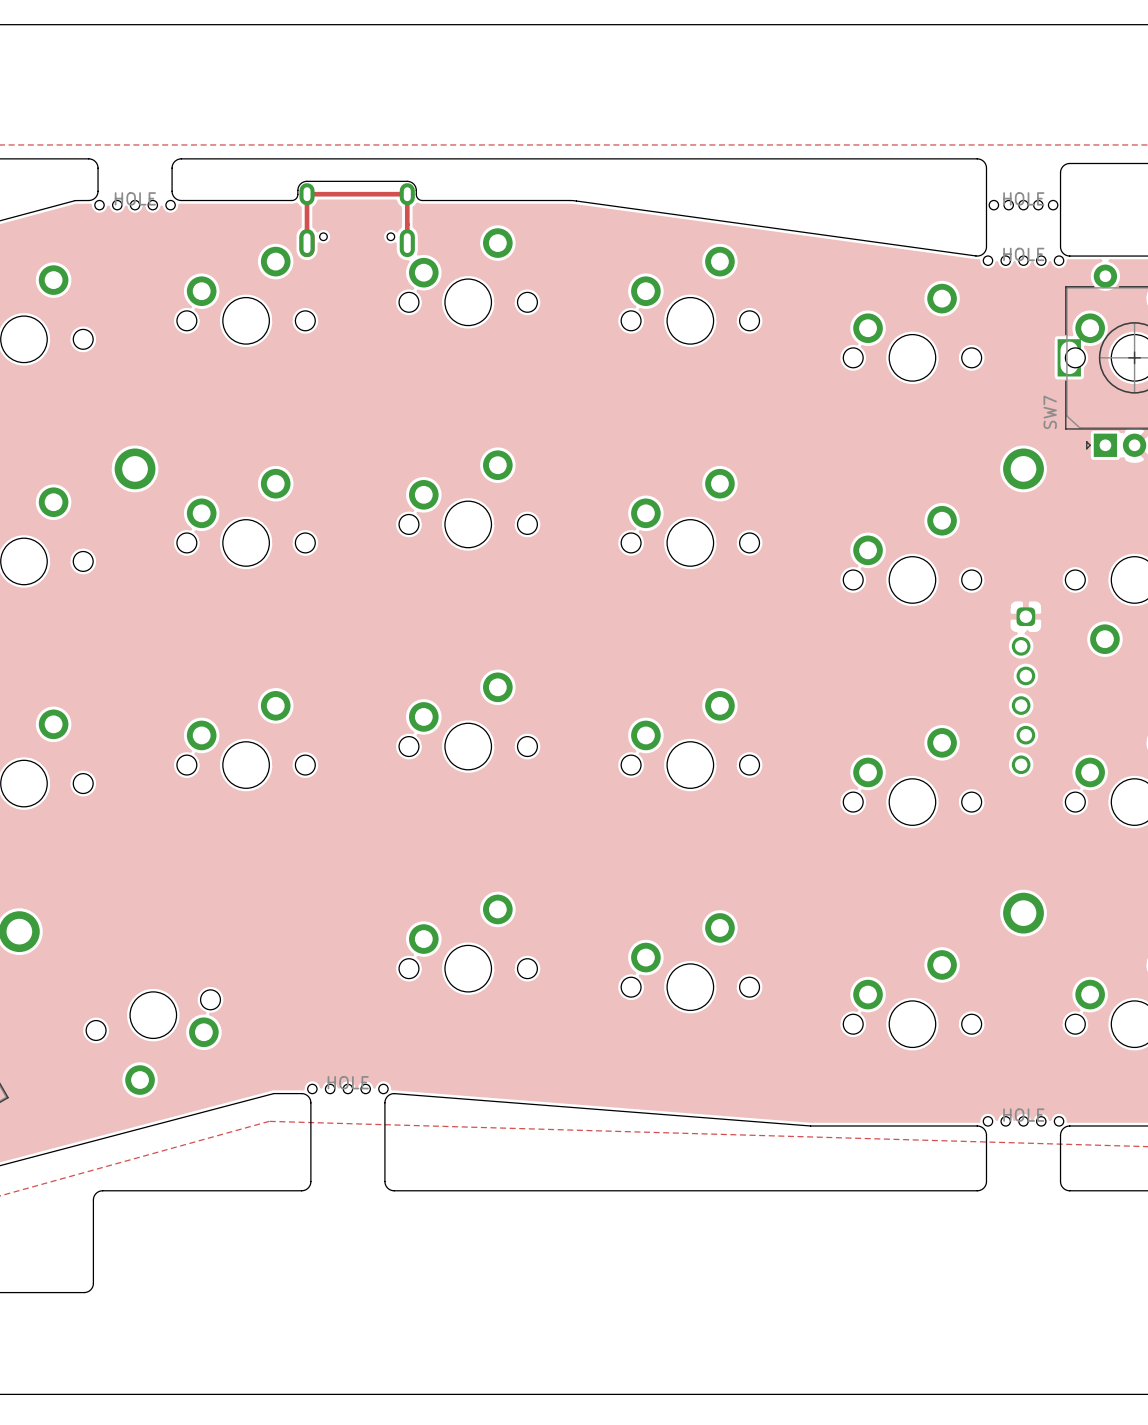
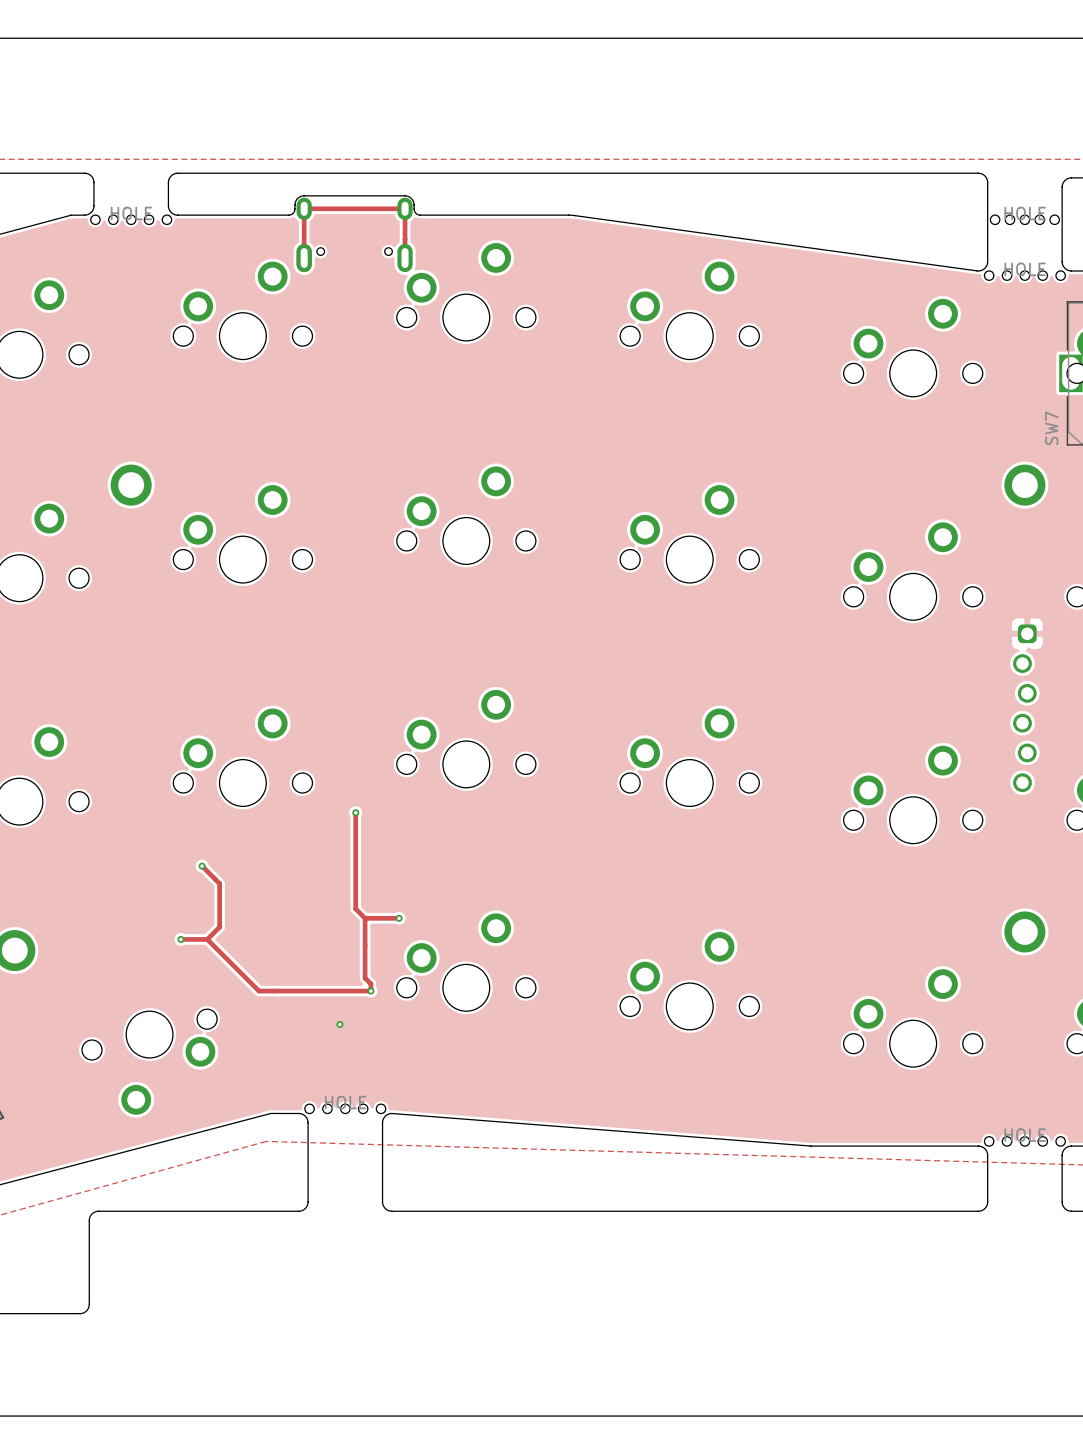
track: none -> (355, 812) (355, 908) (365, 918)
via: none -> (355, 812)
track: none -> (202, 866) (219, 883) (219, 927) (207, 939)
via: none -> (202, 866)
track: none -> (365, 918) (399, 918)
track: none -> (365, 918) (365, 978) (370, 984) (370, 991) (258, 991) (207, 939)
via: none -> (399, 918)
track: none -> (180, 939) (207, 939)
via: none -> (180, 939)
via: none -> (370, 991)
via: none -> (339, 1024)

